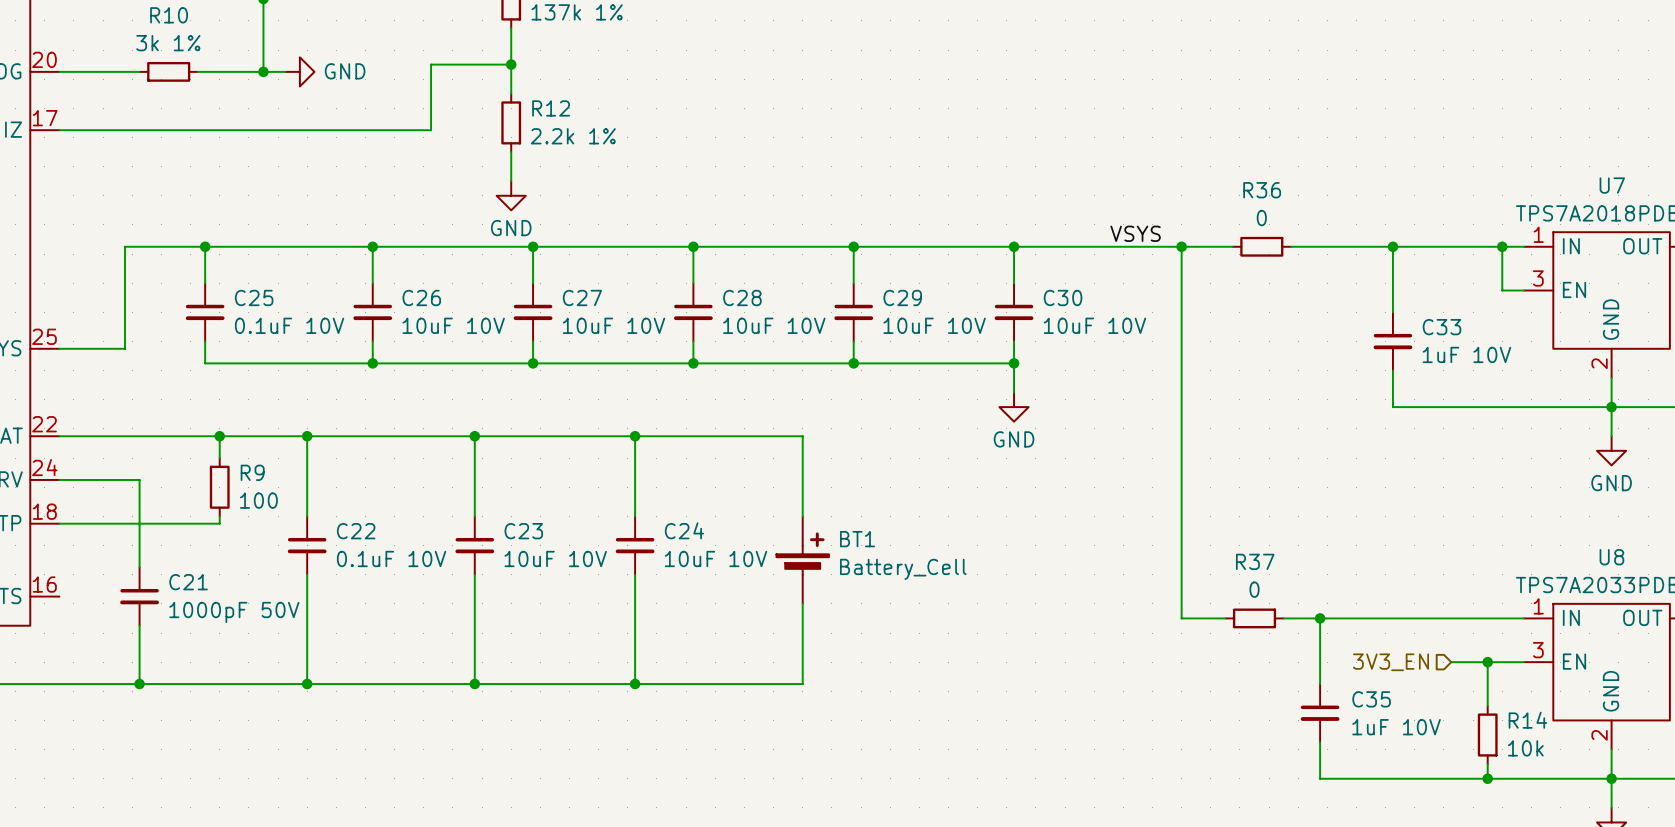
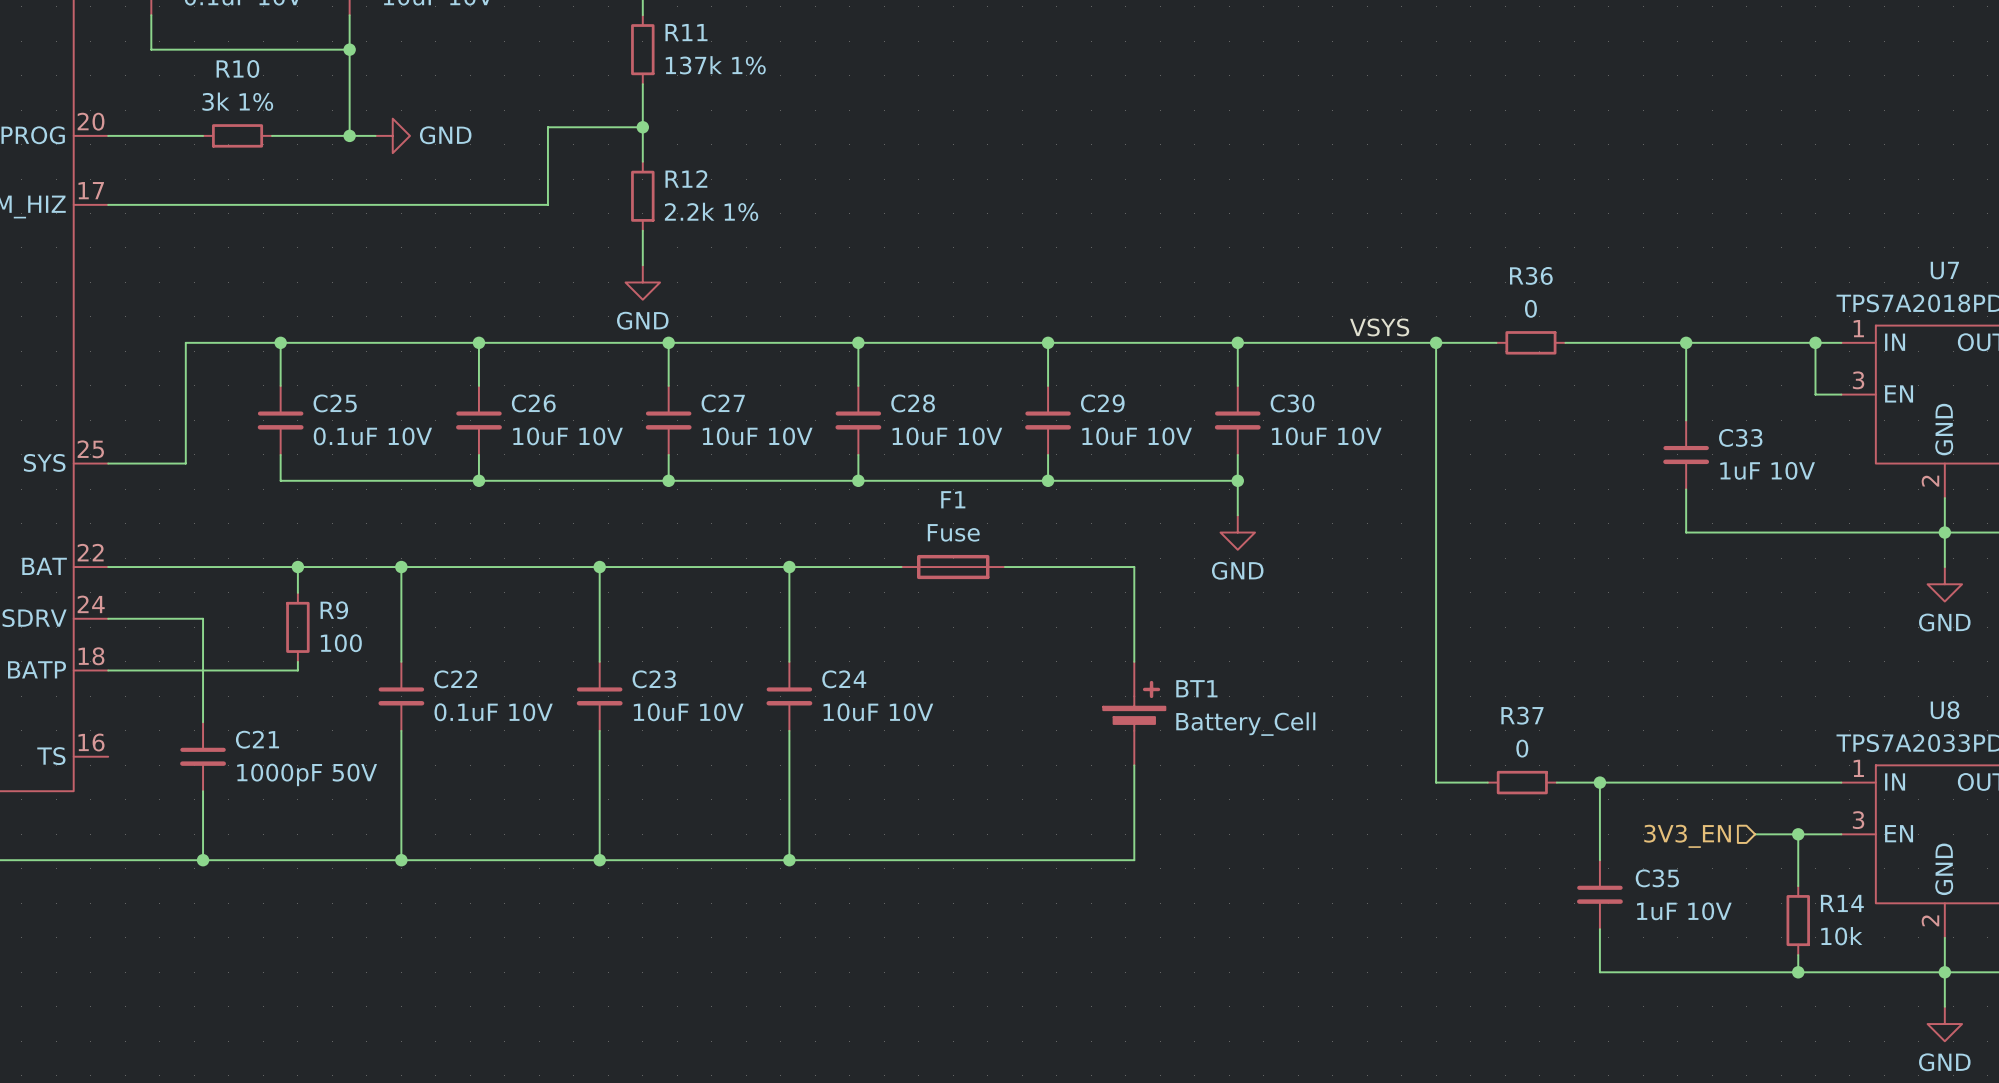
wire: (729, 436) (802, 436) (802, 516) -> none
F1: none -> Fuse (953, 567)
wire: none -> (1004, 567) (1134, 567) (1134, 661)
BT1 position: (802, 560) -> (1134, 713)
wire: (802, 603) (802, 684) -> (1134, 765) (1134, 860) (987, 860)

